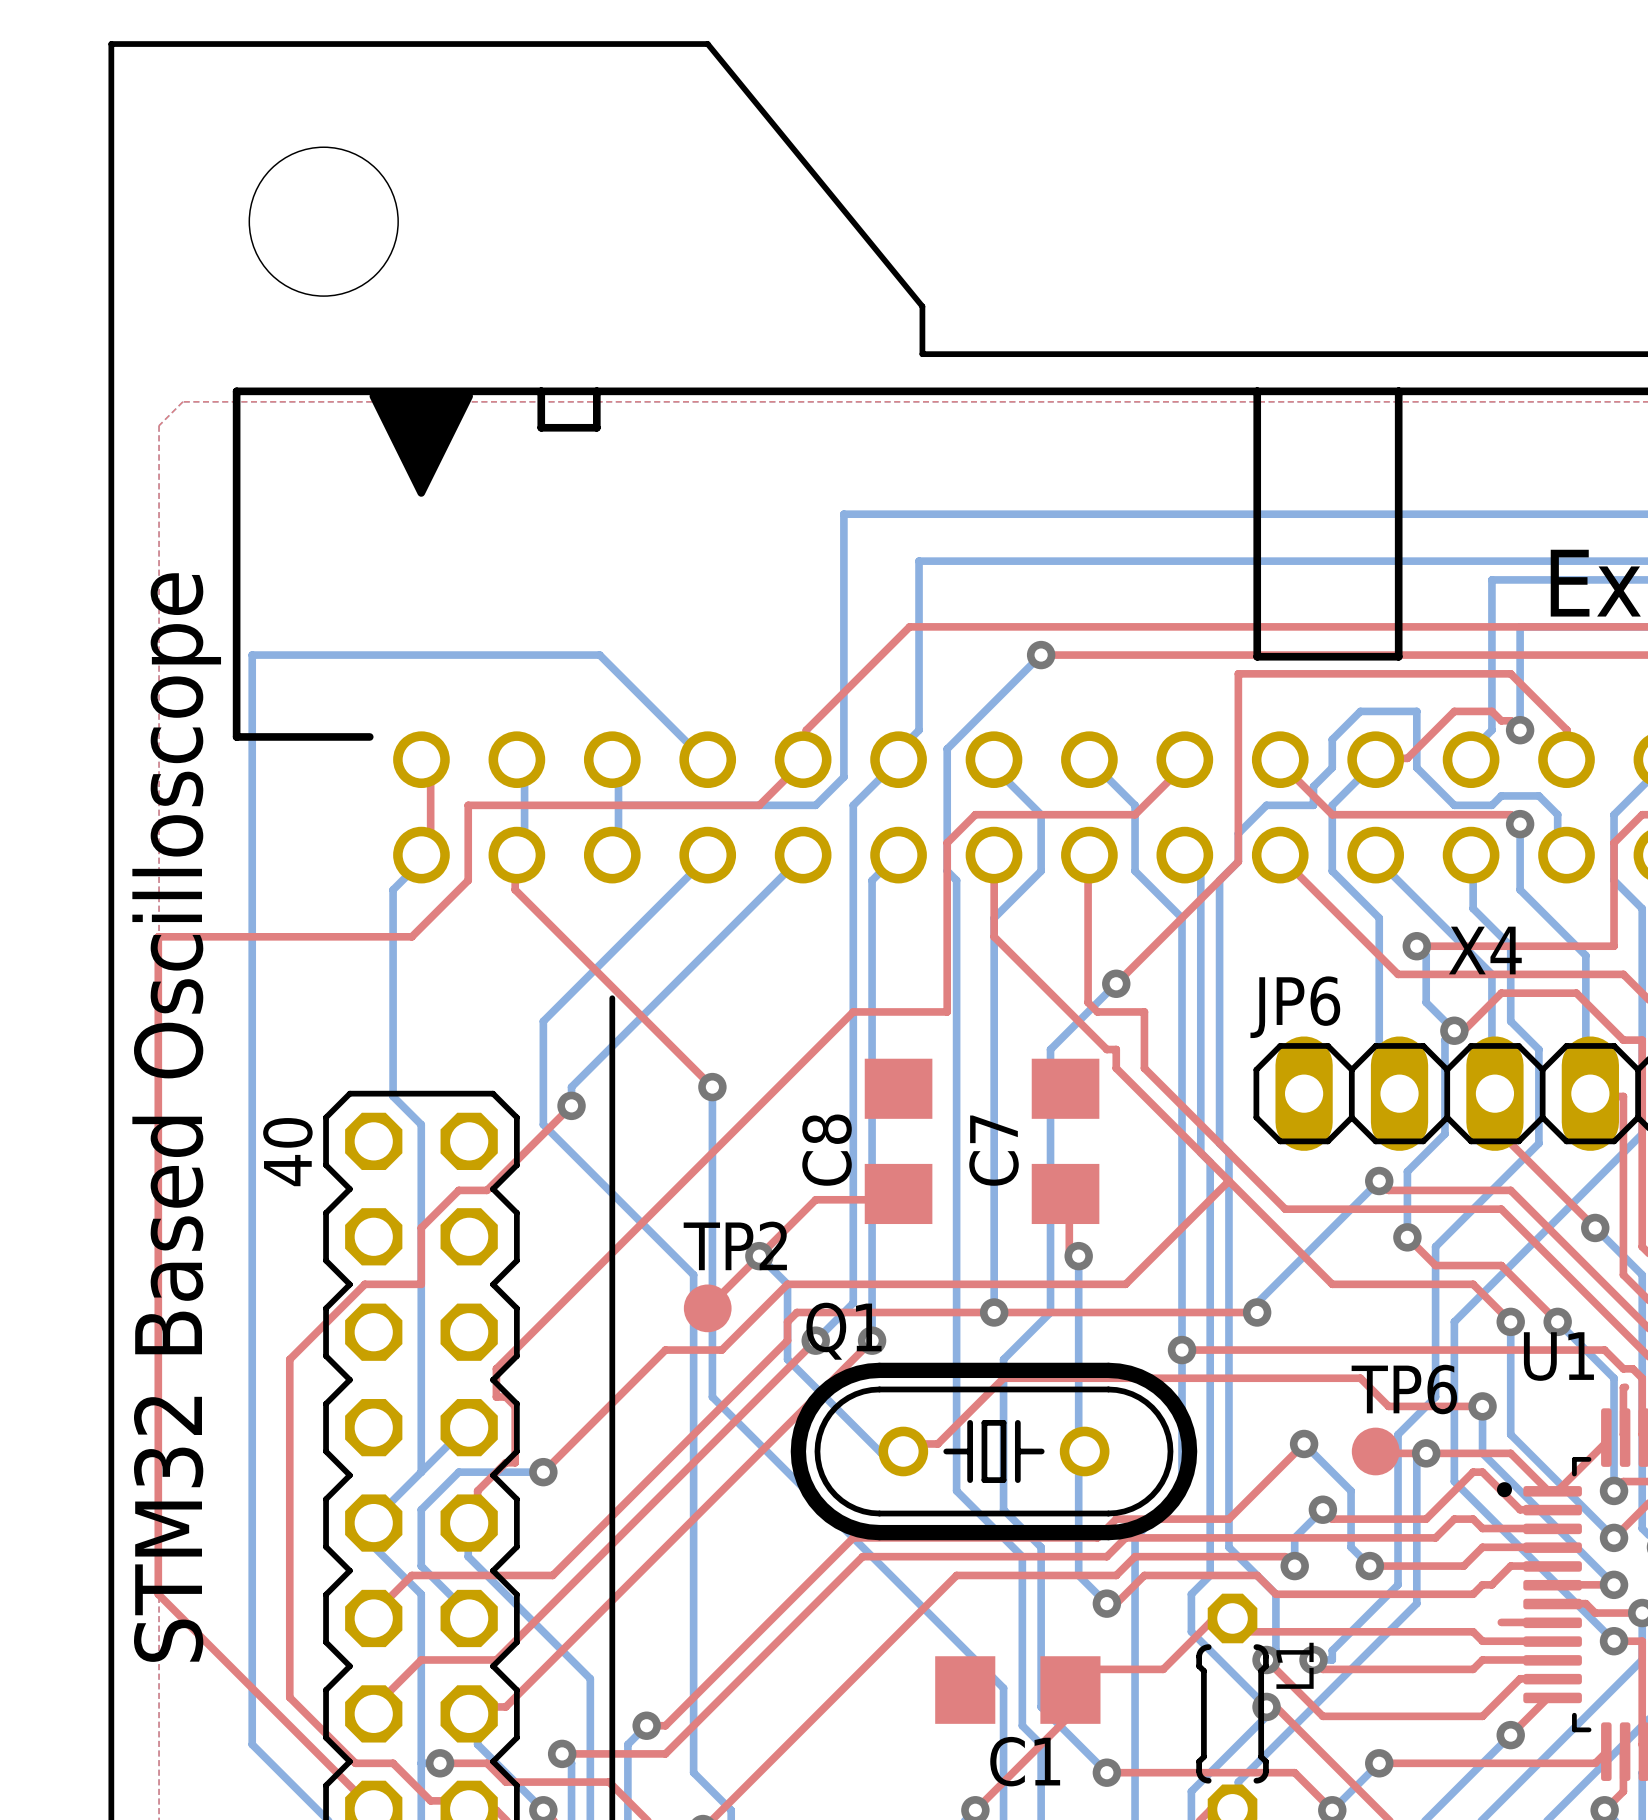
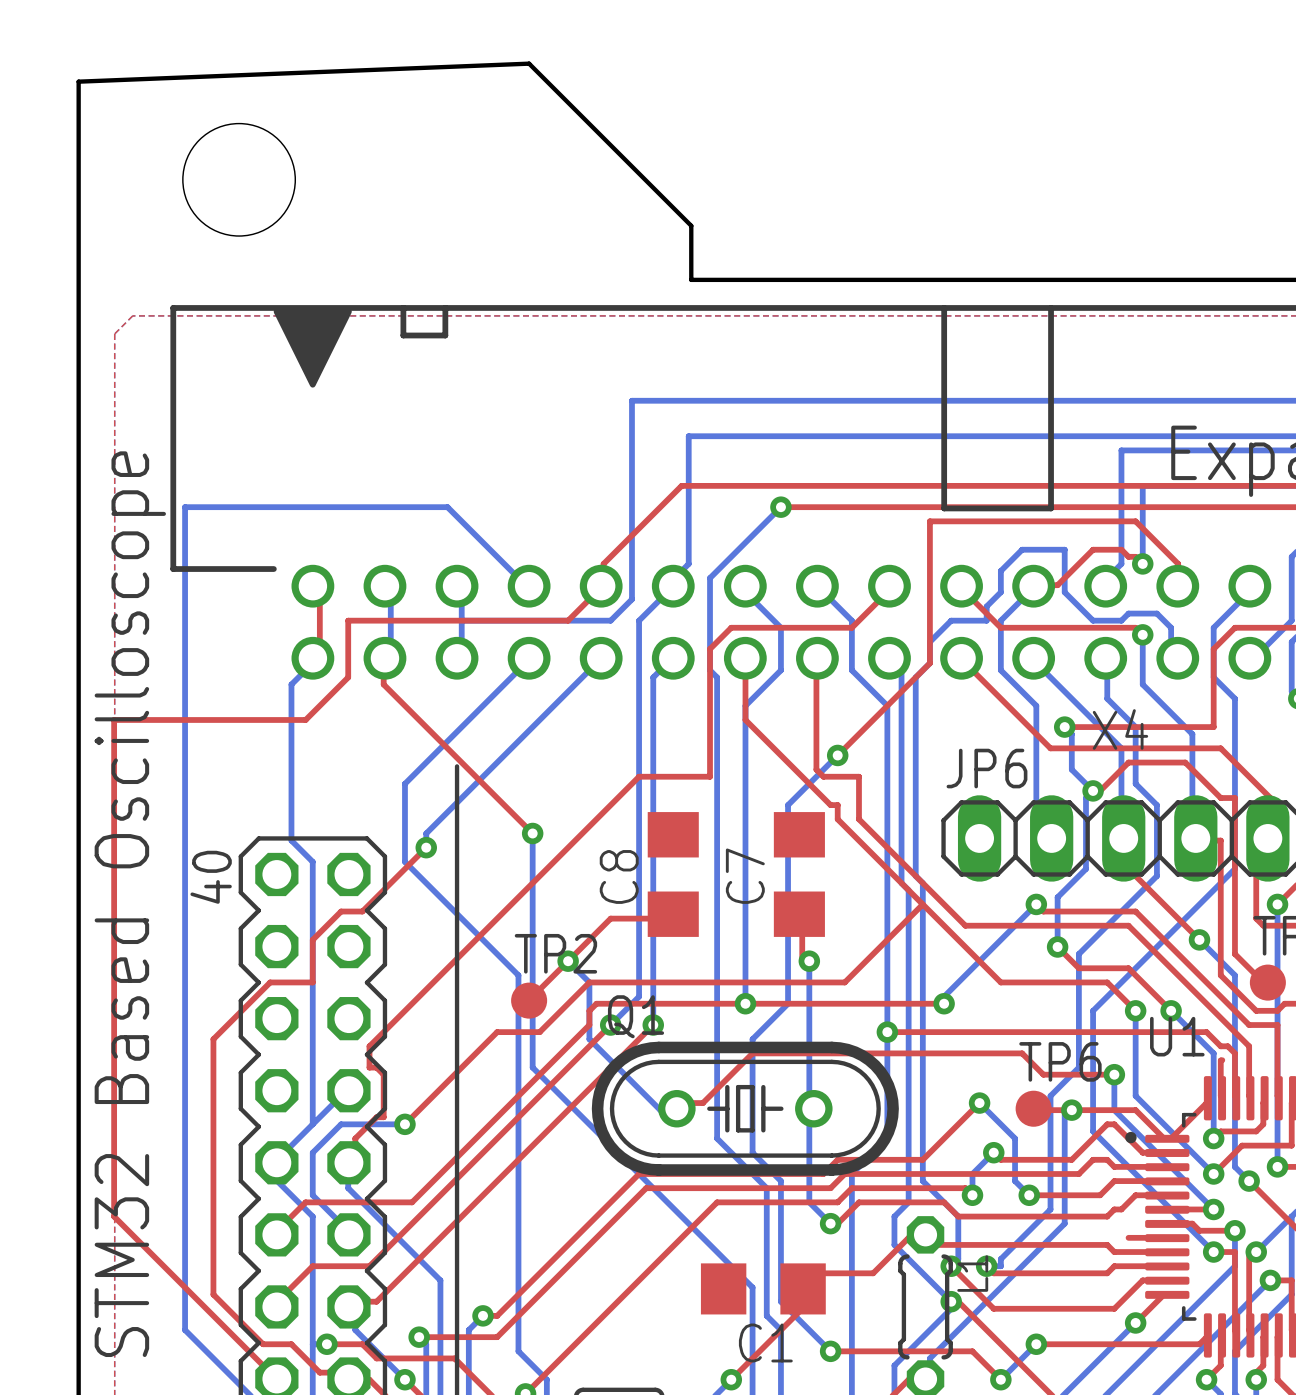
board edge: (111, 91) (111, 44) (707, 44) (922, 306) -> (78, 81) (529, 63) (691, 225) (691, 243)

